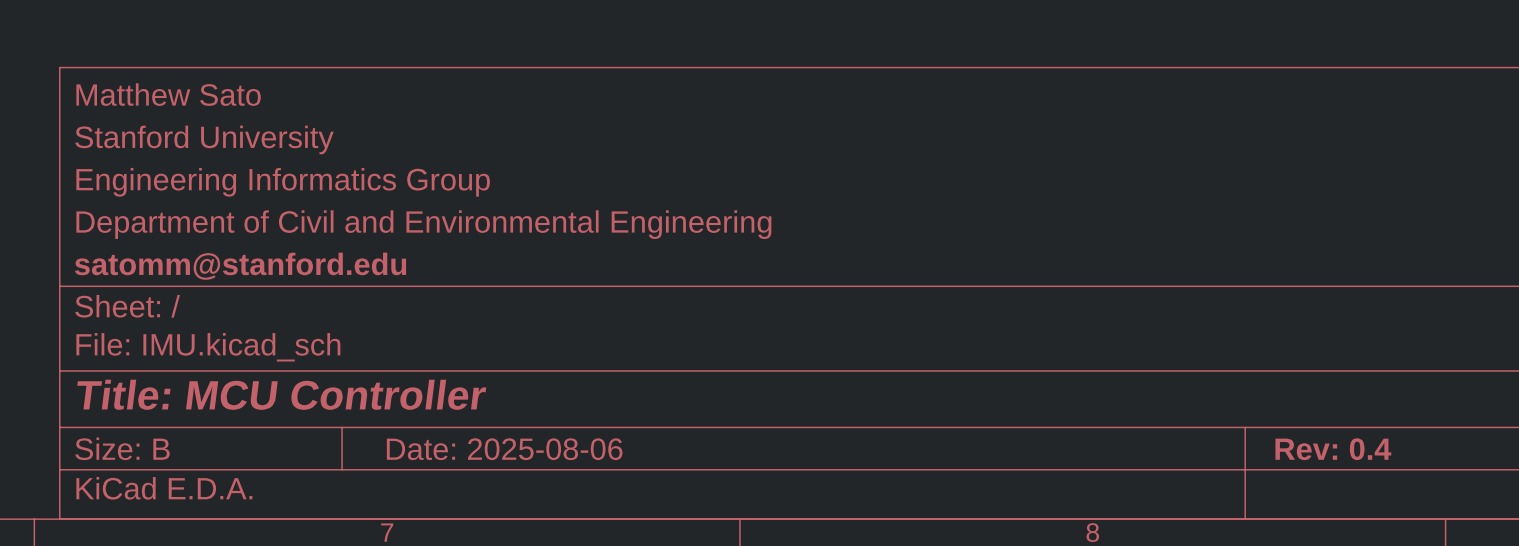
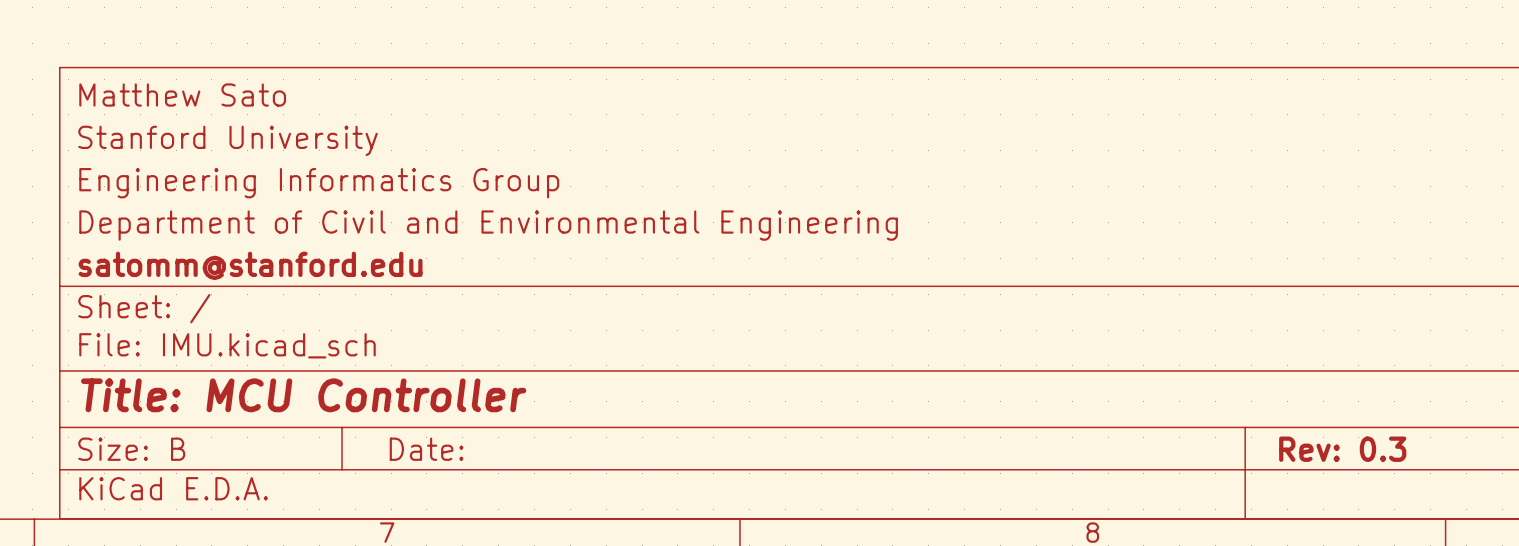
title block: Date: 2025-08-06 (504, 449) -> Date: (426, 449)
title block: Rev: 0.4 (1333, 449) -> Rev: 0.3 (1342, 449)

